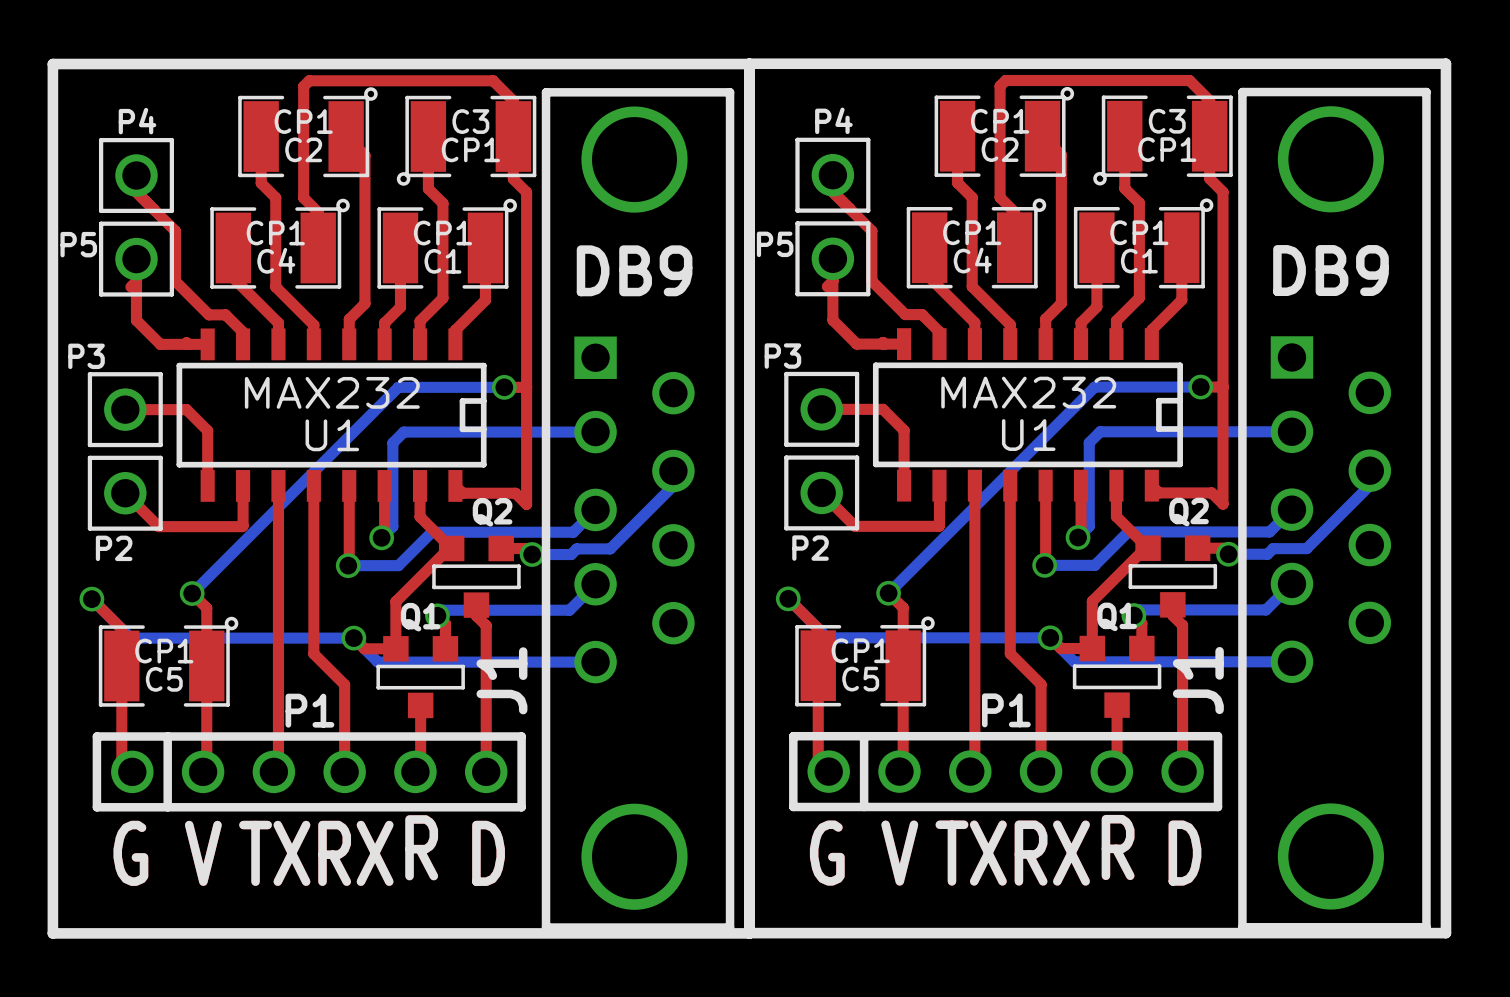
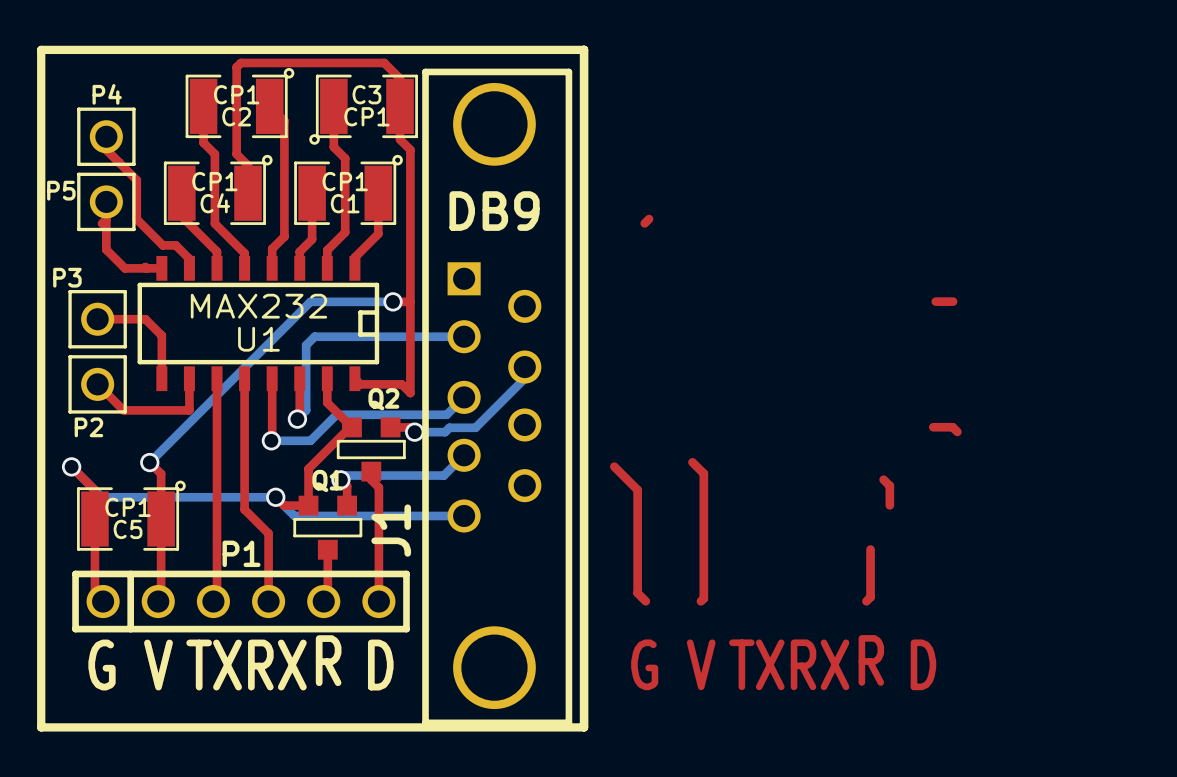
line: (749, 63) (1445, 63) (1445, 933) (749, 933) -> none
C2: CP1 (1004, 131) -> none
top track: (957, 136) (957, 182) (972, 197) (972, 286) (1010, 324) (1010, 344) -> none
top track: (1042, 136) (1061, 155) (1061, 303) (1045, 319) (1045, 344) -> none
top track: (1124, 136) (1124, 188) (1139, 203) (1139, 297) (1116, 320) (1116, 344) -> none
C3: CP1 (1162, 140) -> none
top track: (832, 175) (832, 191) (871, 230) (871, 281) (905, 314) (922, 314) (939, 331) (939, 344) -> none
P4: (832, 175) -> none
C4: CP1 (976, 243) -> none
C1: CP1 (1143, 243) -> none
top track: (929, 247) (929, 277) (974, 322) (974, 344) -> none
top track: (1014, 247) (1014, 212) (1000, 197) (1000, 86) (1005, 80) (1189, 80) (1209, 100) (1209, 178) (1223, 192) (1223, 504) (1211, 492) (1159, 492) (1151, 485) -> none
top track: (1096, 247) (1096, 306) (1081, 322) (1081, 344) -> none
top track: (1181, 247) (1181, 300) (1151, 330) (1151, 344) -> none
top track: (832, 258) (832, 320) (856, 344) (883, 344) (883, 342) (904, 344) -> none
P5: (832, 258) -> none
bottom track: (1200, 387) (1094, 387) (888, 593) -> none
via: (1200, 387) -> none
top track: (821, 409) (883, 409) (904, 430) (904, 485) -> none
P3: (821, 409) -> none
U1: MAX232 (1027, 414) -> none
bottom track: (1291, 431) (1100, 431) (1089, 442) (1089, 526) (1078, 537) -> none
bottom track: (1369, 470) (1369, 485) (1306, 548) (1273, 548) (1267, 554) (1228, 554) -> none
top track: (939, 485) (938, 526) (855, 526) (821, 492) -> none
top track: (974, 485) (974, 767) (970, 771) -> none
top track: (1010, 485) (1010, 653) (1041, 684) (1041, 771) -> none
top track: (1045, 485) (1044, 565) -> none
top track: (1081, 485) (1081, 534) (1078, 537) -> none
top track: (1116, 485) (1116, 516) (1148, 548) (1145, 548) (1092, 601) (1092, 648) (1060, 648) (1050, 637) -> none
P2: (821, 492) -> none
bottom track: (1291, 509) (1269, 531) (1128, 531) (1094, 565) (1044, 565) -> none
J1: DB9 (1334, 509) -> none
via: (1078, 537) -> none
via: (1228, 554) -> none
via: (1044, 565) -> none
Q2: (1172, 576) -> none
bottom track: (1291, 583) (1265, 609) (1139, 609) (1133, 615) -> none
via: (888, 593) -> none
bottom track: (788, 598) (827, 637) (1050, 637) (1074, 661) (1291, 661) -> none
via: (788, 598) -> none
top track: (1172, 604) (1172, 615) (1182, 625) (1182, 771) -> none
via: (1133, 615) -> none
via: (1050, 637) -> none
C5: CP1 (864, 661) -> none
Q1: (1117, 676) -> none
P1: (1005, 771) -> none
text: R (1118, 847) -> none
text: G (827, 853) -> none
text: V (899, 853) -> none
text: TX (971, 853) -> none
text: RX (1052, 853) -> none
text: D (1184, 853) -> none

